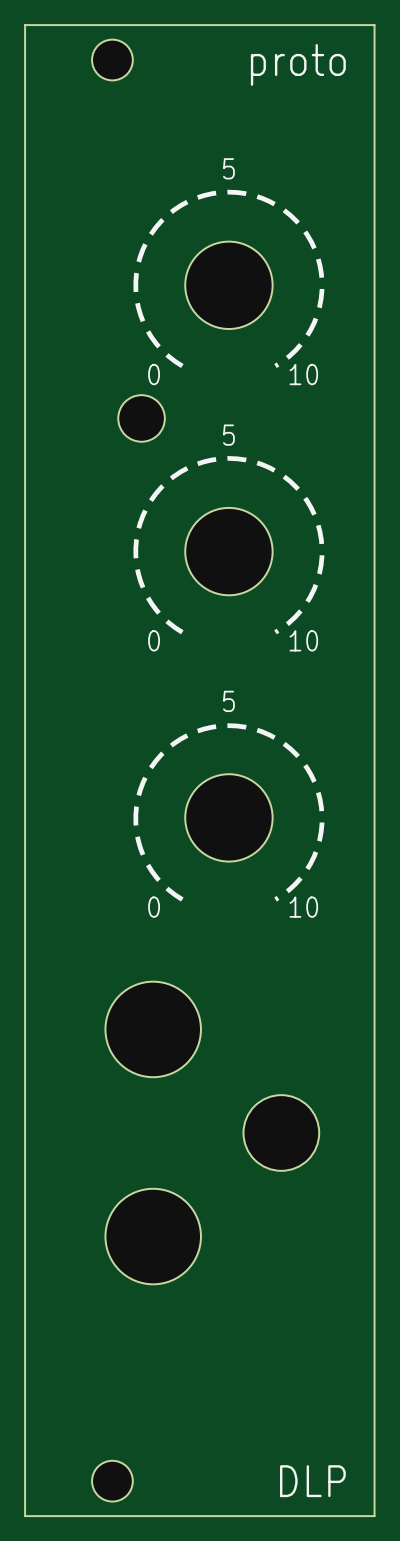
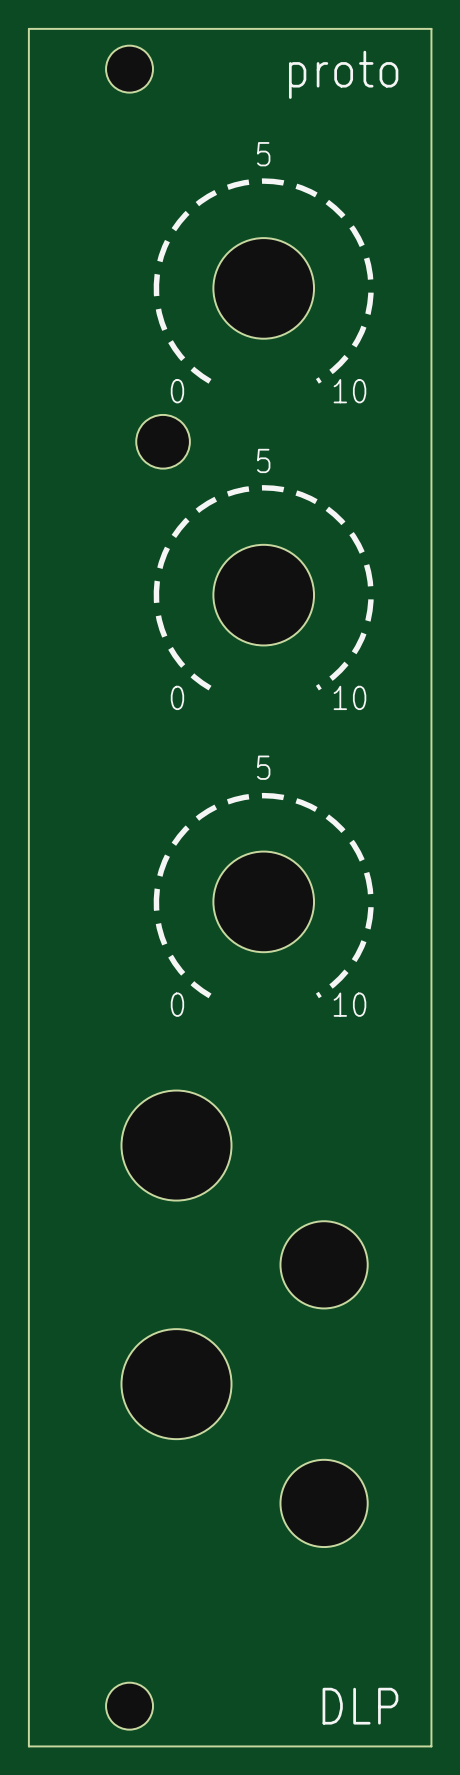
text position: 5 (228, 168) -> 5 (263, 154)
hole position: (228, 285) -> (263, 288)
line: (182, 366) (162, 350) (151, 337) (143, 322) (138, 307) (135, 290) (137, 265) (146, 241) (155, 227) (167, 215) (180, 205) (196, 198) (212, 193) (228, 192) (245, 193) (261, 198) (276, 205) (290, 215) (302, 227) (311, 241) (319, 265) (321, 290) (319, 307) (314, 322) (306, 337) (295, 350) (275, 366) -> (210, 381) (187, 363) (174, 348) (165, 331) (159, 313) (156, 294) (158, 265) (168, 238) (179, 221) (192, 207) (208, 196) (225, 188) (244, 182) (263, 181) (282, 182) (301, 188) (319, 196) (334, 207) (347, 221) (358, 238) (368, 265) (370, 294) (368, 313) (361, 331) (352, 348) (340, 363) (317, 381)
text position: 0 (154, 374) -> 0 (177, 391)
text position: 10 (303, 374) -> 10 (349, 391)
hole position: (141, 418) -> (163, 441)
text position: 5 (228, 435) -> 5 (263, 460)
hole position: (228, 551) -> (263, 595)
line: (182, 632) (162, 616) (151, 603) (143, 589) (138, 573) (135, 556) (137, 531) (146, 507) (155, 493) (167, 481) (180, 471) (196, 464) (212, 459) (228, 458) (245, 459) (261, 464) (276, 471) (290, 481) (302, 493) (311, 507) (319, 531) (321, 556) (319, 573) (314, 589) (306, 603) (295, 616) (275, 632) -> (210, 688) (187, 670) (174, 655) (165, 638) (159, 620) (156, 600) (158, 572) (168, 544) (179, 528) (192, 514) (208, 503) (225, 494) (244, 489) (263, 487) (282, 489) (301, 494) (319, 503) (334, 514) (347, 528) (358, 544) (368, 572) (370, 600) (368, 620) (361, 638) (352, 655) (340, 670) (317, 688)
text position: 0 (154, 640) -> 0 (177, 697)
text position: 10 (303, 640) -> 10 (349, 697)
text position: 5 (228, 701) -> 5 (263, 767)
hole position: (228, 817) -> (263, 901)
line: (182, 899) (162, 884) (151, 871) (143, 856) (138, 840) (135, 823) (137, 798) (146, 775) (155, 761) (167, 748) (180, 738) (196, 731) (212, 727) (228, 725) (245, 727) (261, 731) (276, 738) (290, 748) (302, 761) (311, 775) (319, 798) (321, 823) (319, 840) (314, 856) (306, 871) (295, 884) (275, 899) -> (210, 995) (187, 978) (174, 963) (165, 946) (159, 927) (156, 908) (158, 879) (168, 852) (179, 836) (192, 822) (208, 811) (225, 802) (244, 797) (263, 795) (282, 797) (301, 802) (319, 811) (334, 822) (347, 836) (358, 852) (368, 879) (370, 908) (368, 927) (361, 946) (352, 963) (340, 978) (317, 995)
text position: 0 (154, 907) -> 0 (177, 1004)
text position: 10 (303, 907) -> 10 (349, 1004)
hole position: (153, 1029) -> (176, 1145)
hole position: (281, 1132) -> (324, 1264)
hole position: (153, 1236) -> (176, 1384)
hole: none -> (324, 1503)

